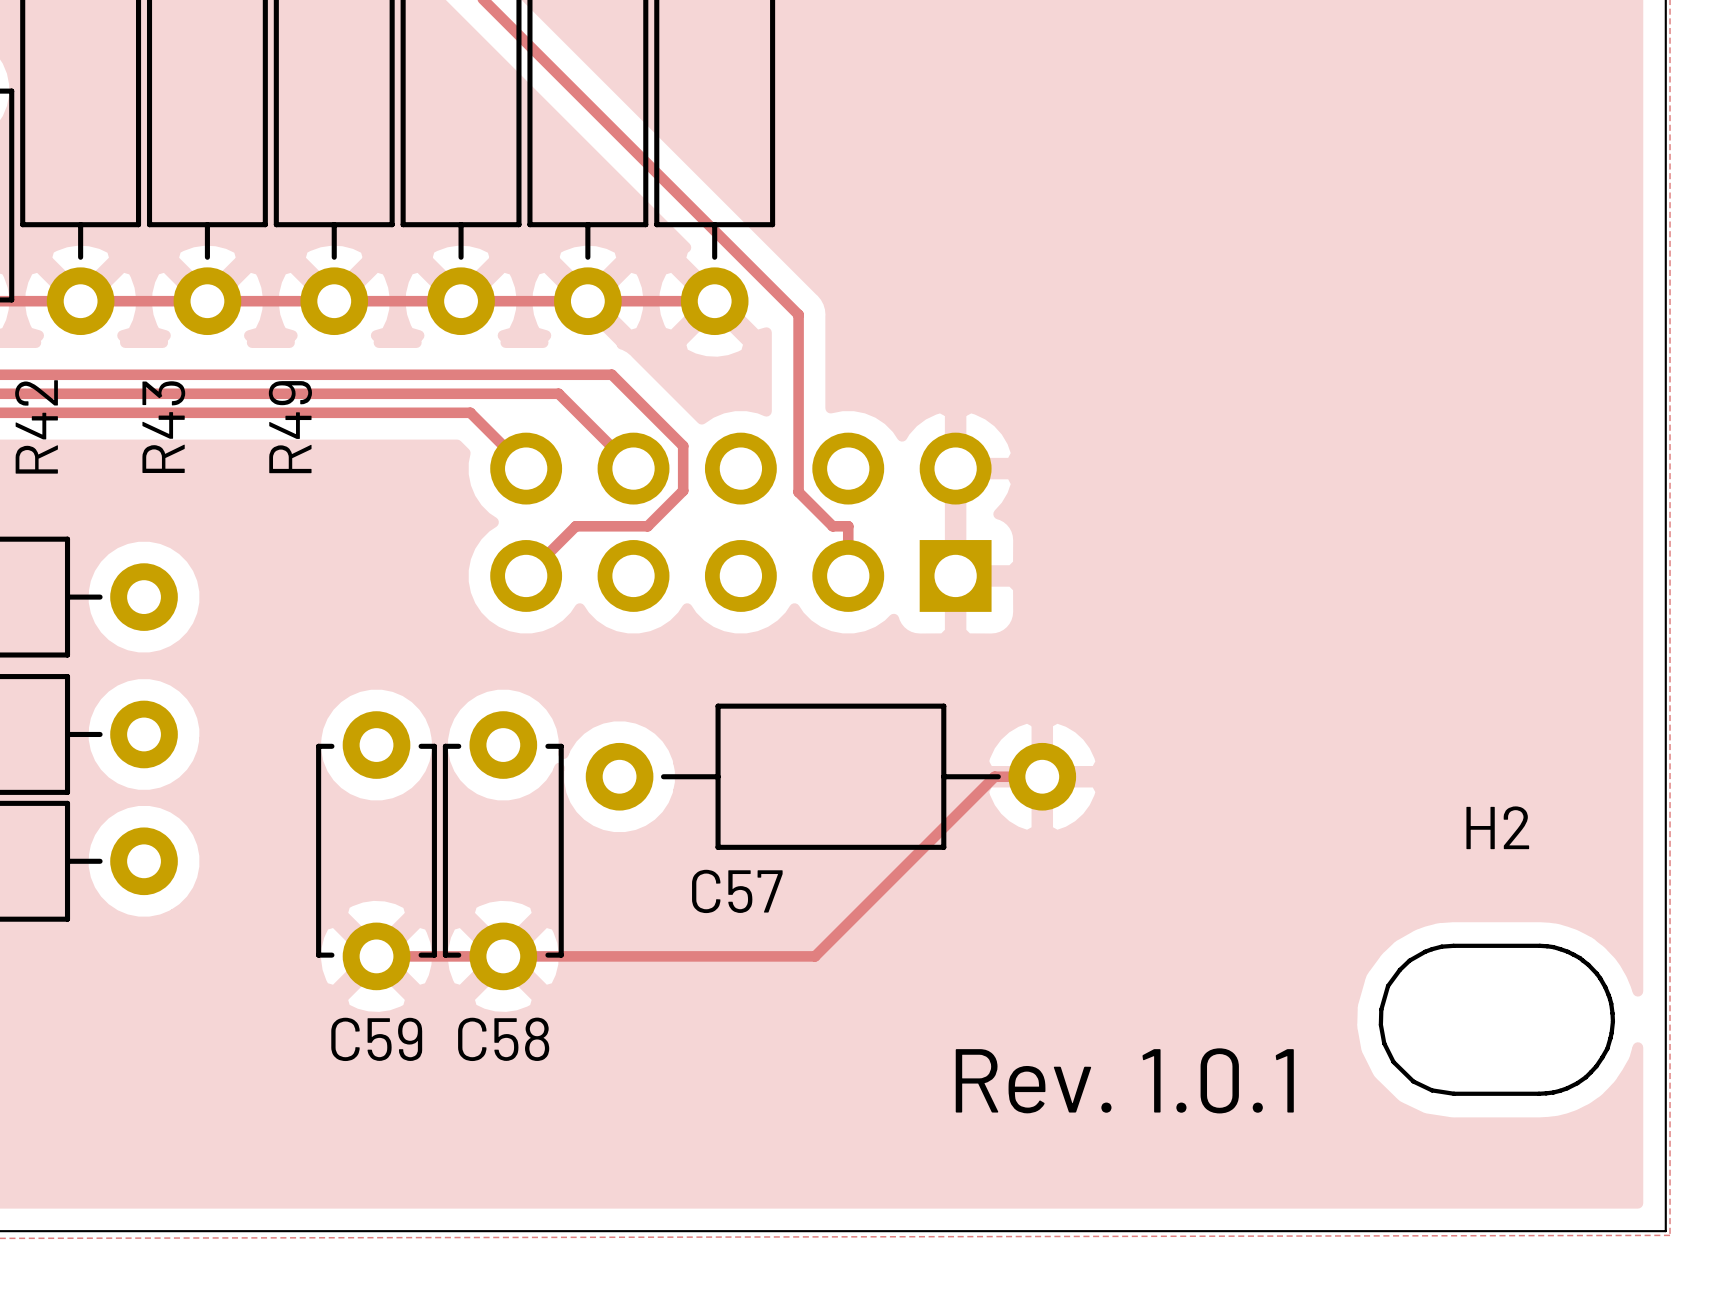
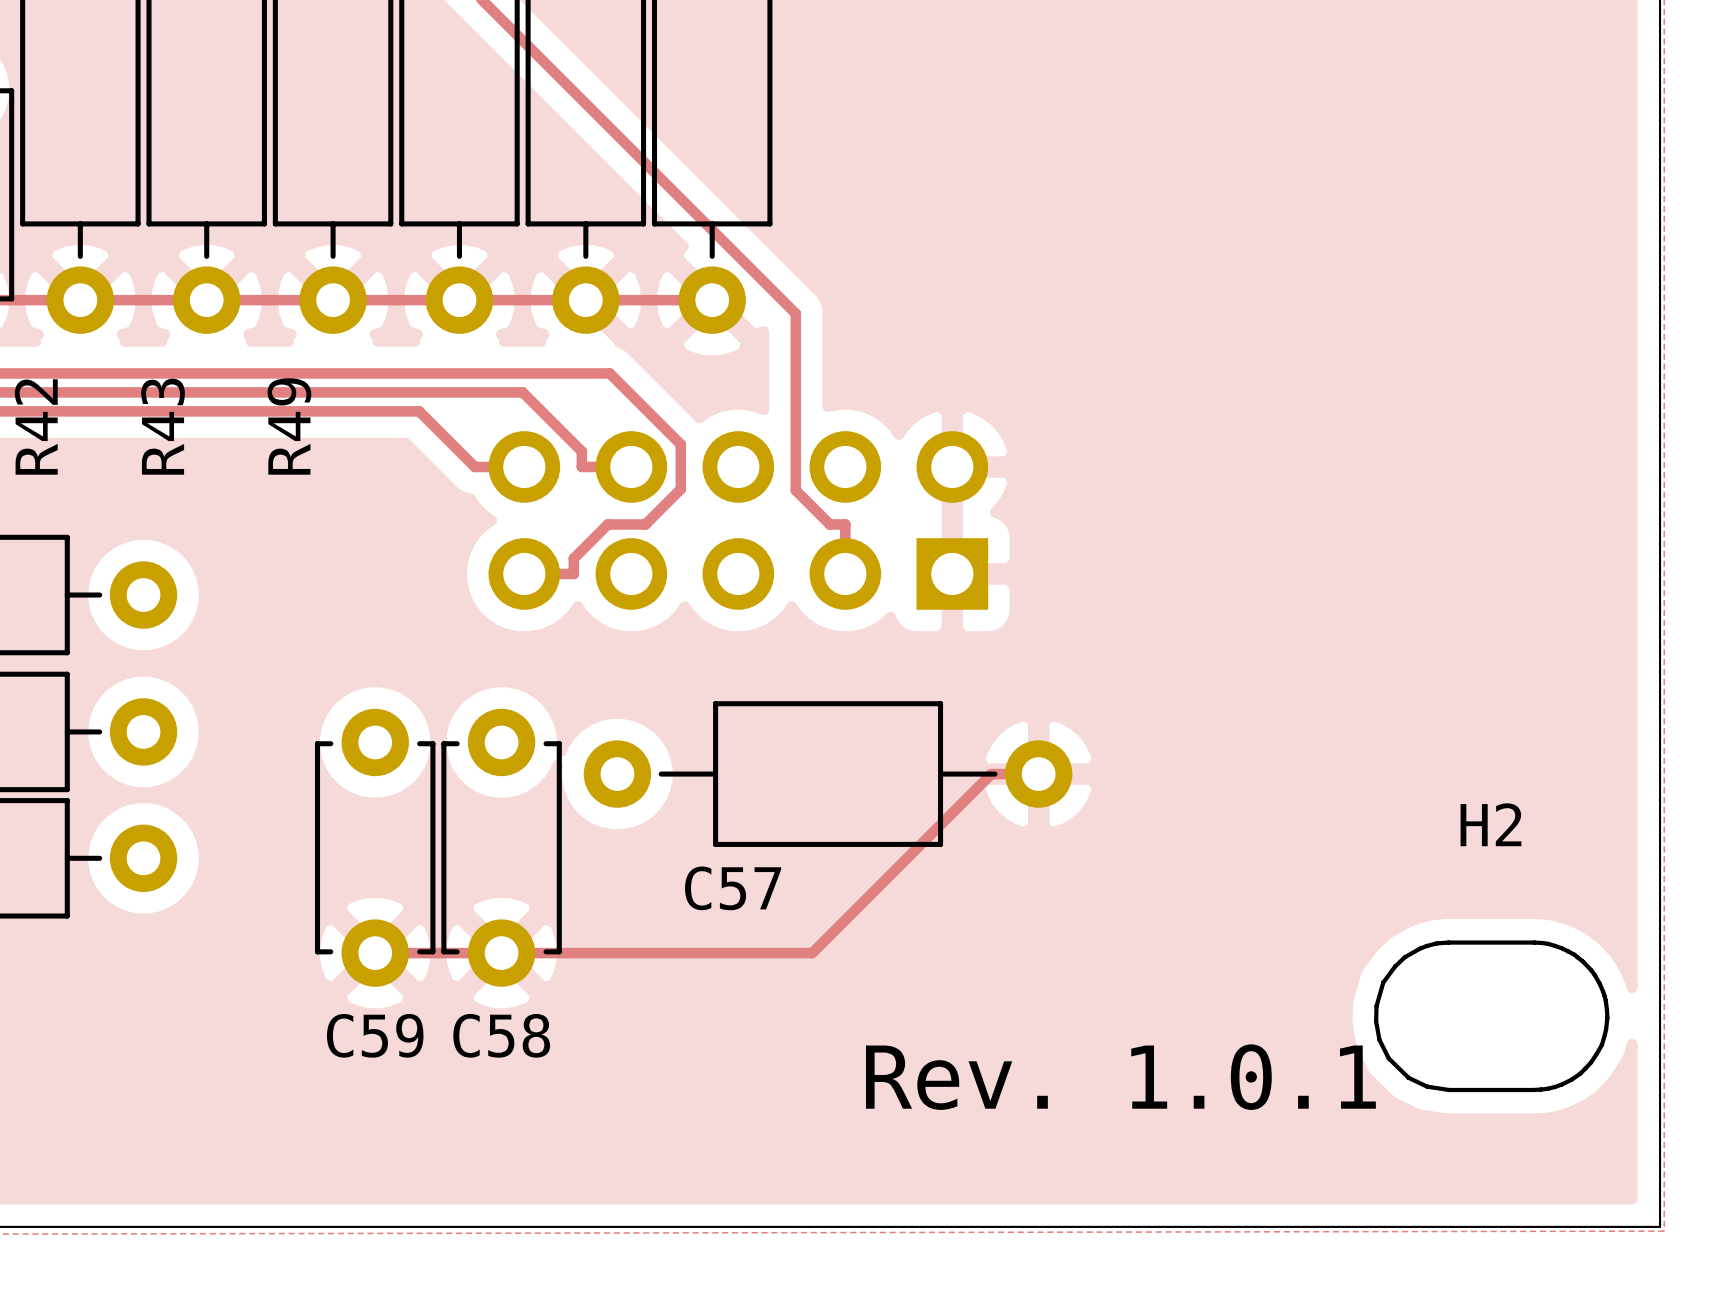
track: (524, 393) (558, 393) (633, 468) -> (522, 392) (581, 451) (581, 466) (631, 466)
track: (420, 412) (470, 412) (526, 468) -> (419, 411) (474, 466) (524, 466)
track: (609, 526) (575, 526) (526, 575) -> (607, 524) (573, 558) (573, 573) (524, 573)

